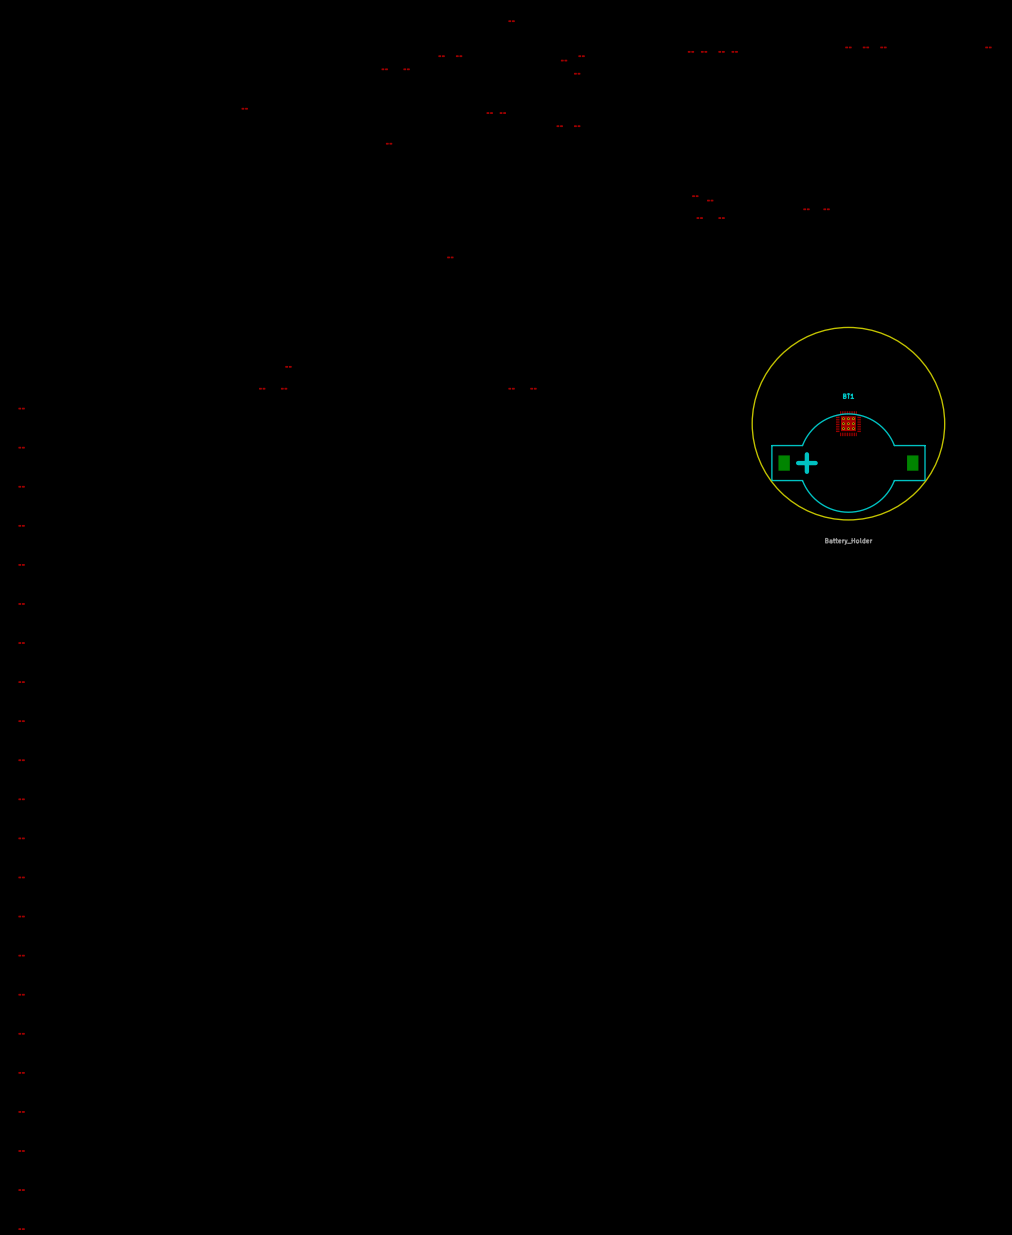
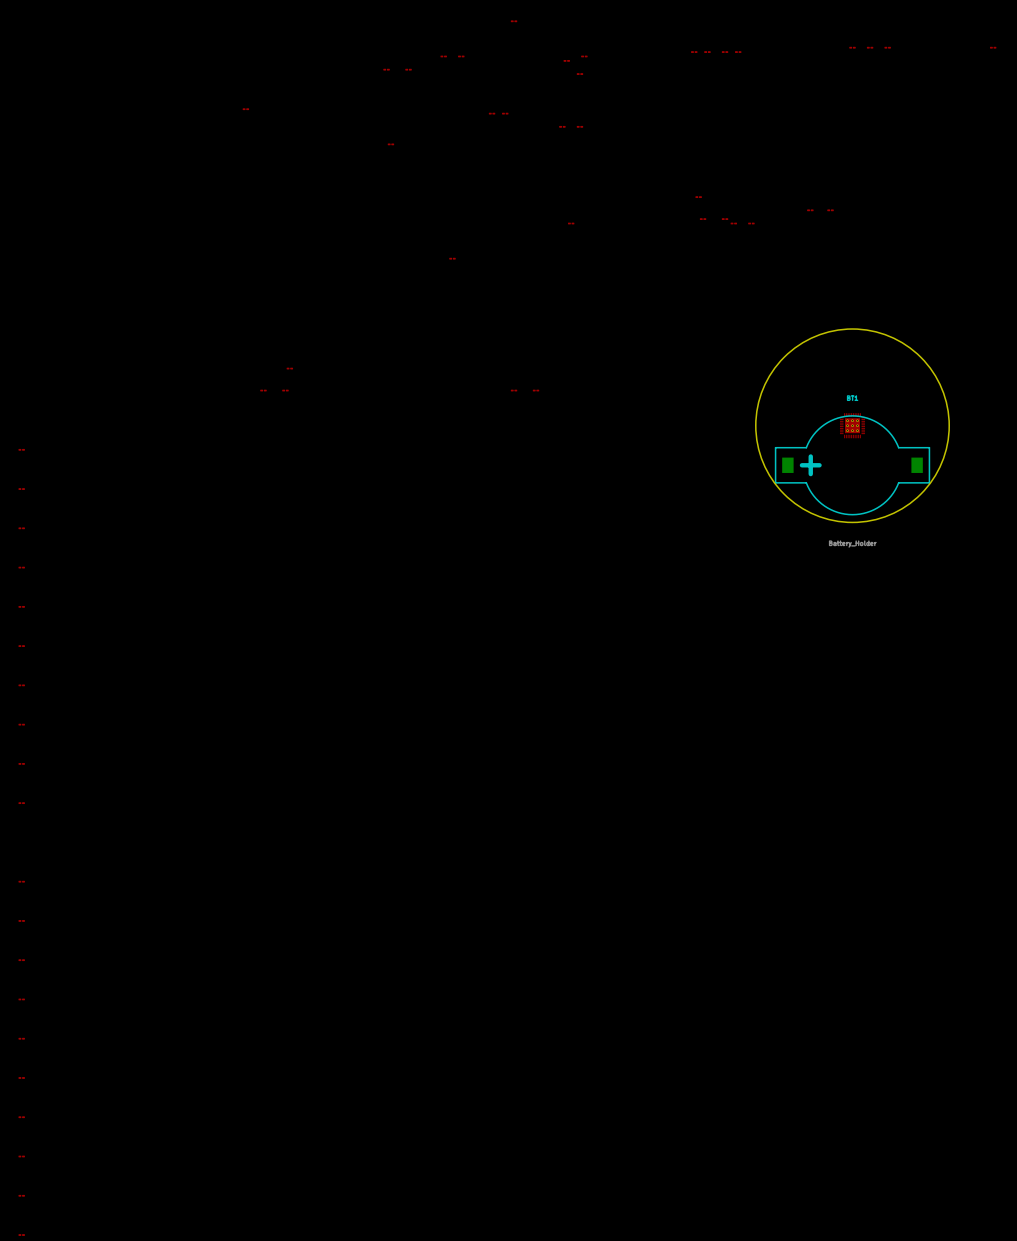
part: (710, 200) -> none
part: none -> (571, 223)
part: none -> (733, 223)
part: none -> (751, 223)
part: (21, 408) -> none
part: (21, 838) -> none

